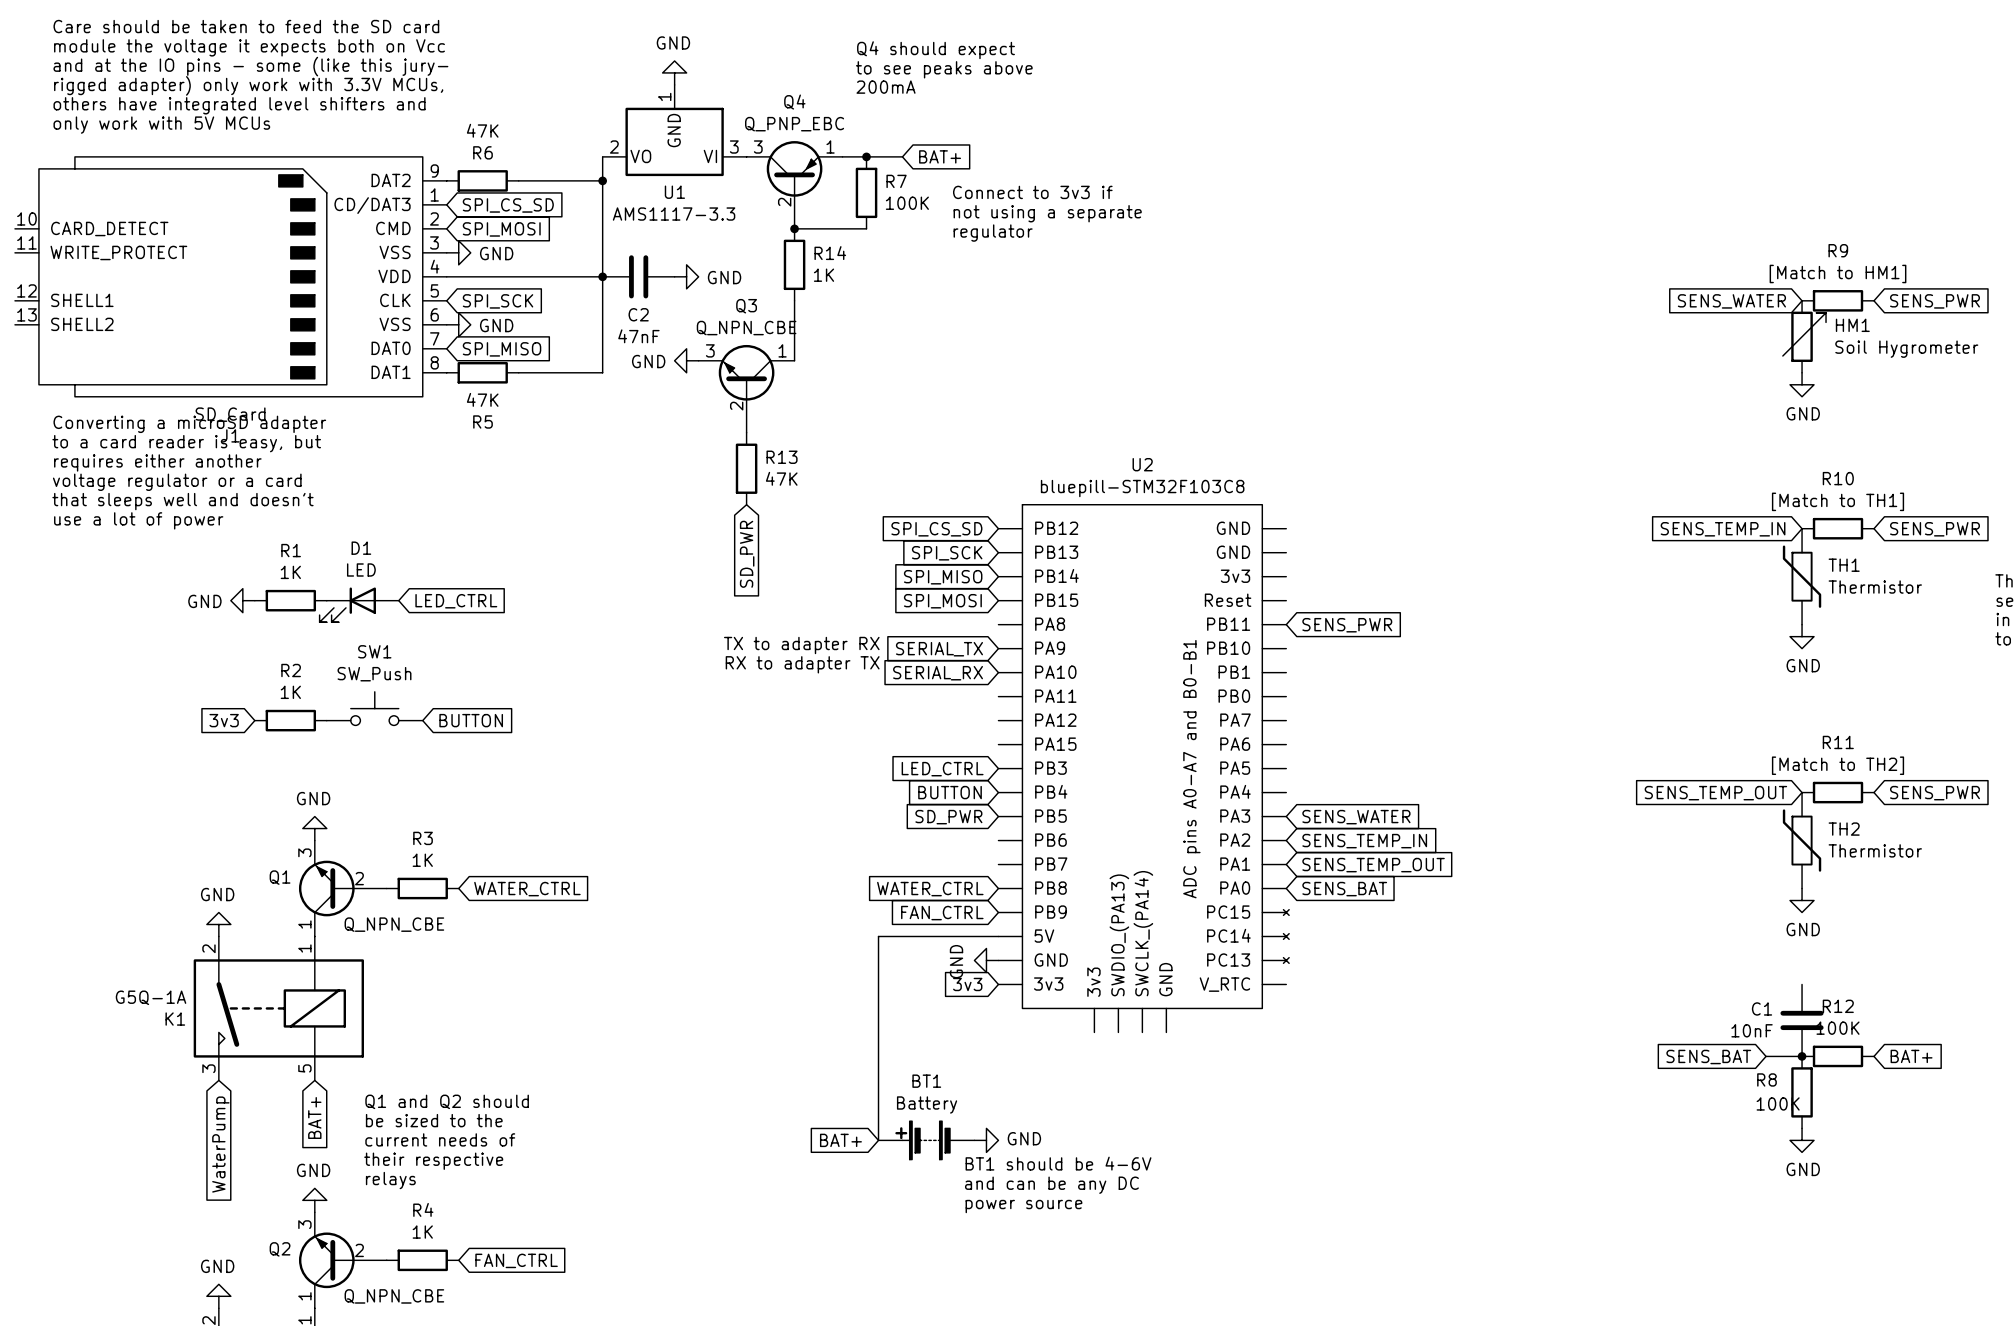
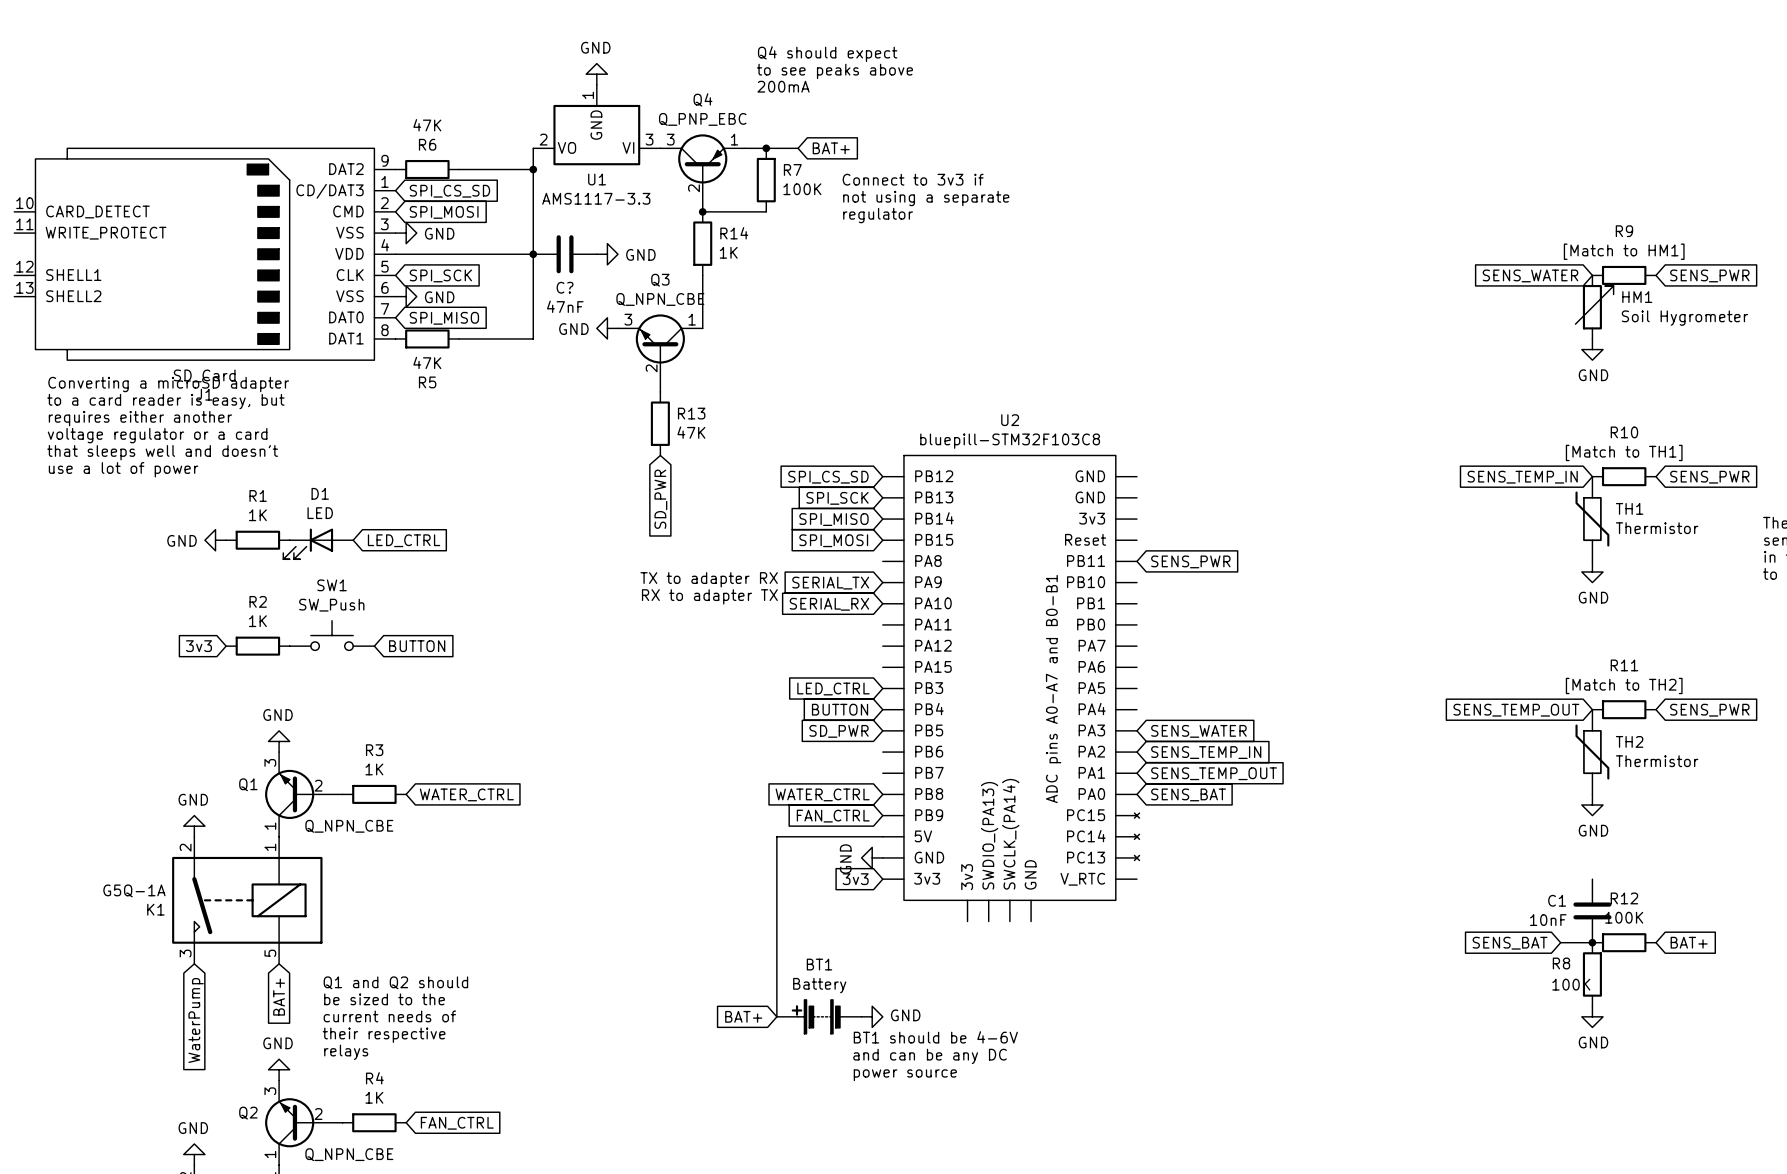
text: Care should be taken to feed the SD card (246, 26) -> none
text: module the voltage it expects both on Vcc (249, 47) -> none
text: and at the IO pins - some (like this jury- (250, 66) -> none
text: rigged adapter) only work with 3.3V MCUs, (248, 85) -> none
text: others have integrated level shifters and (239, 105) -> none
text: only work with 5V MCUs (161, 125) -> none
C2 name: C2 (638, 314) -> C? (565, 287)

